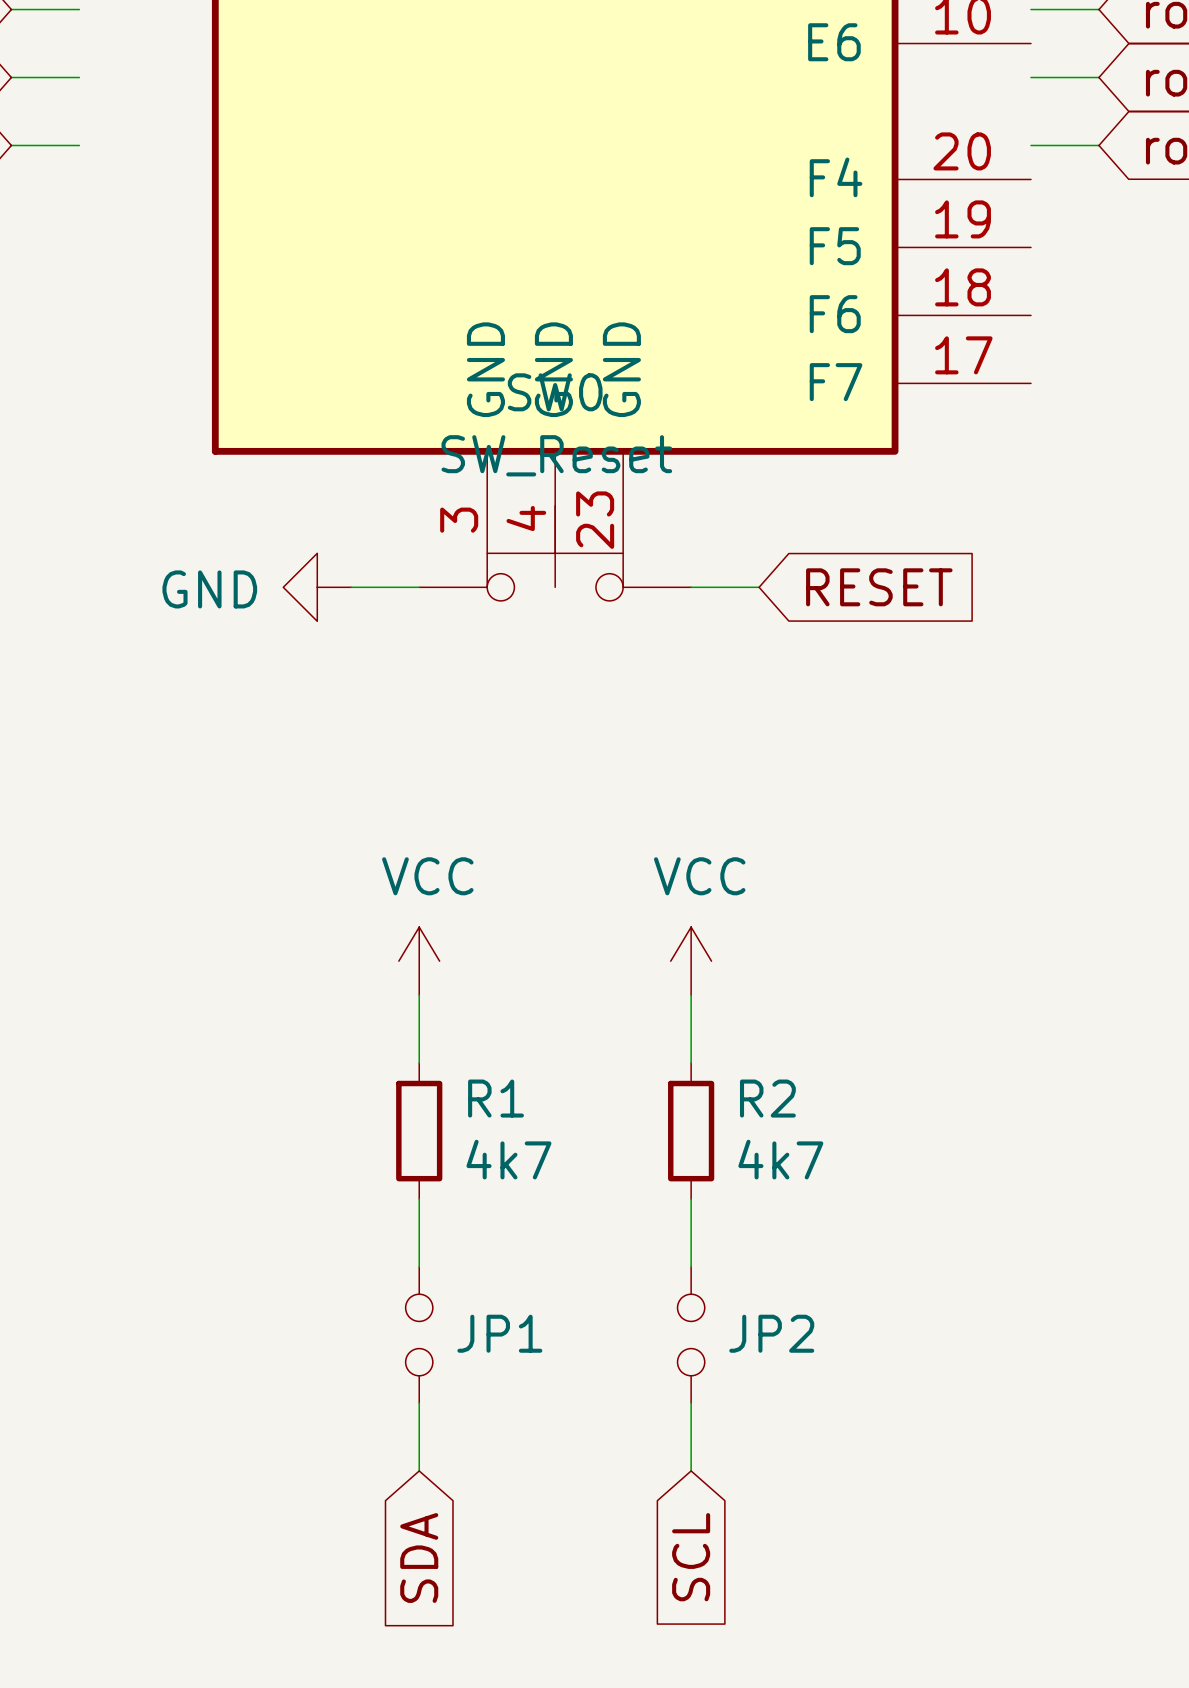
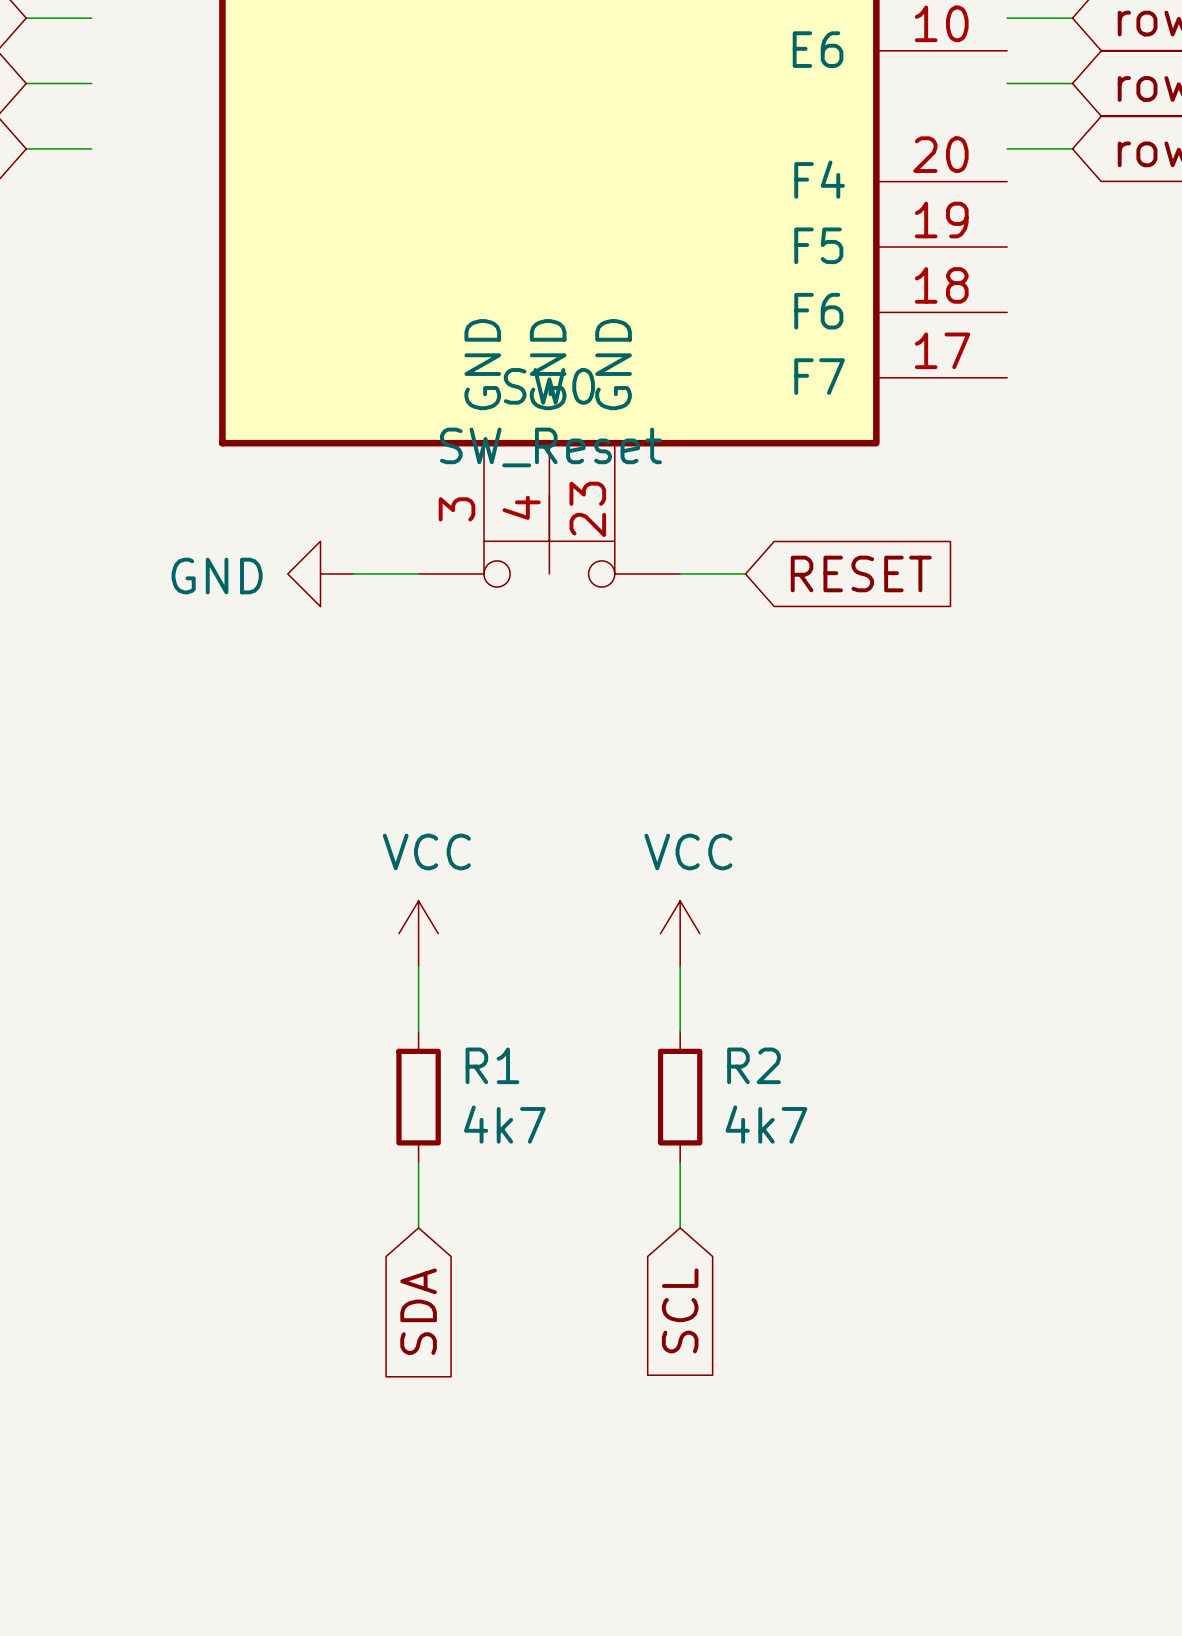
JP1: (419, 1335) -> none
JP2: (691, 1335) -> none
wire: (419, 1402) (419, 1470) -> none
wire: (691, 1402) (691, 1470) -> none
global label position: SDA (419, 1557) -> SDA (418, 1311)
global label position: SCL (691, 1557) -> SCL (680, 1310)

